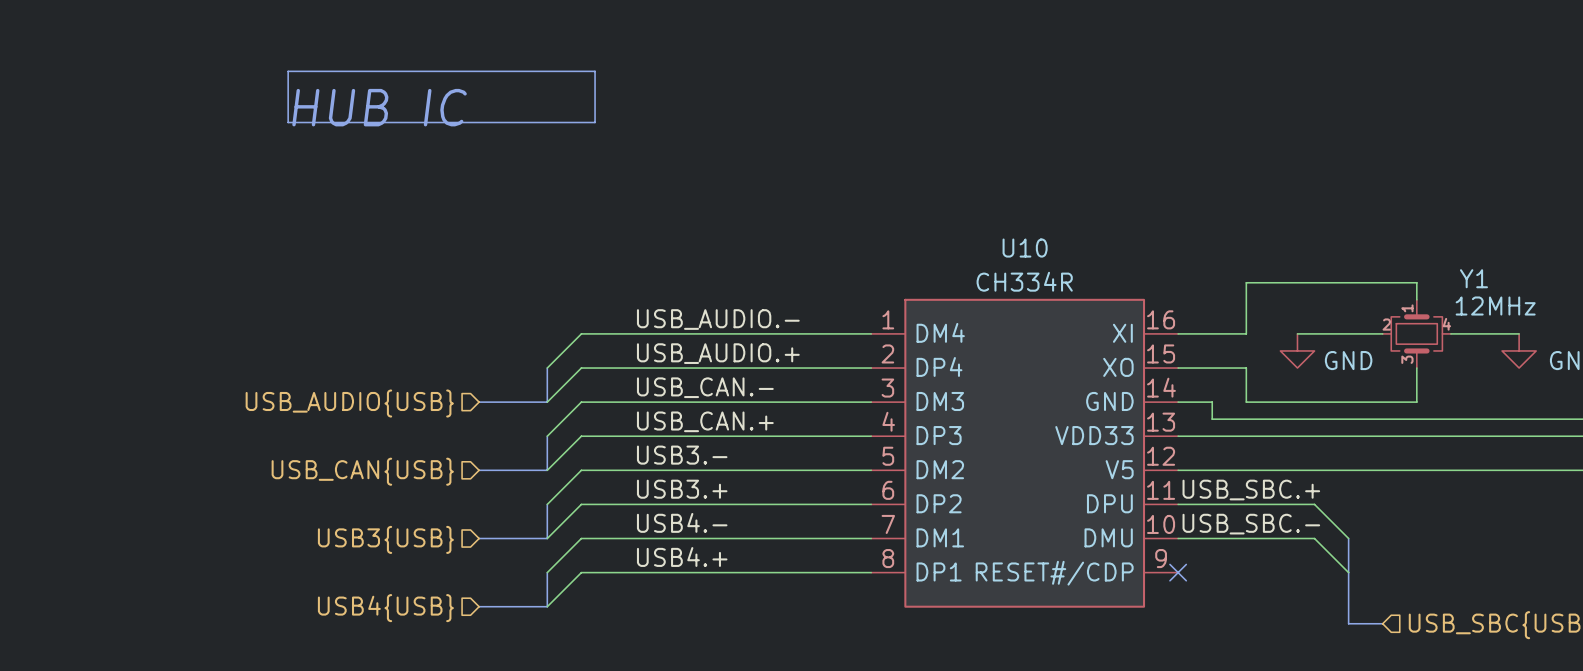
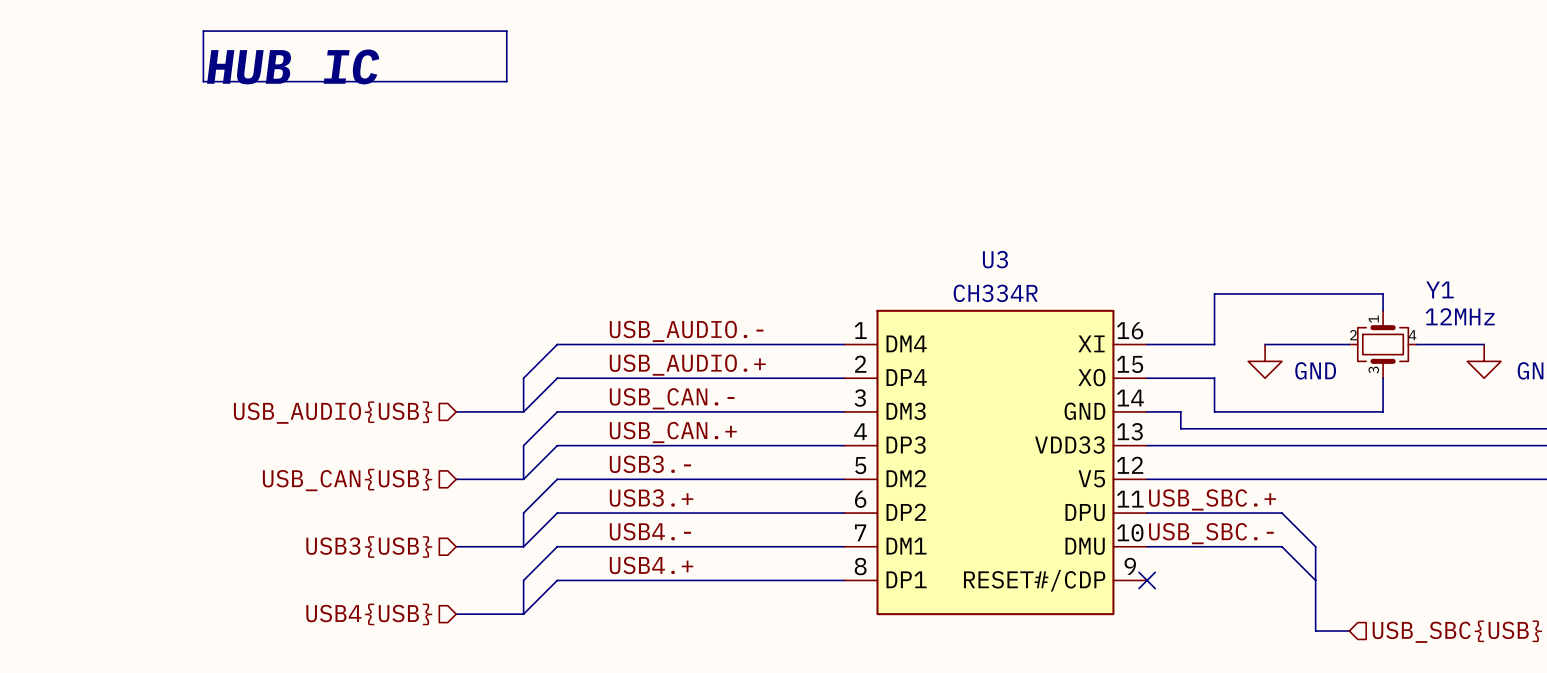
line: (288, 71) (595, 71) (595, 122) (288, 122) (288, 71) -> (203, 31) (506, 31) (506, 81) (203, 81) (203, 31)
text position: HUB IC (379, 107) -> HUB IC (293, 66)
U10 name: U10 (1025, 248) -> U3 (995, 259)

